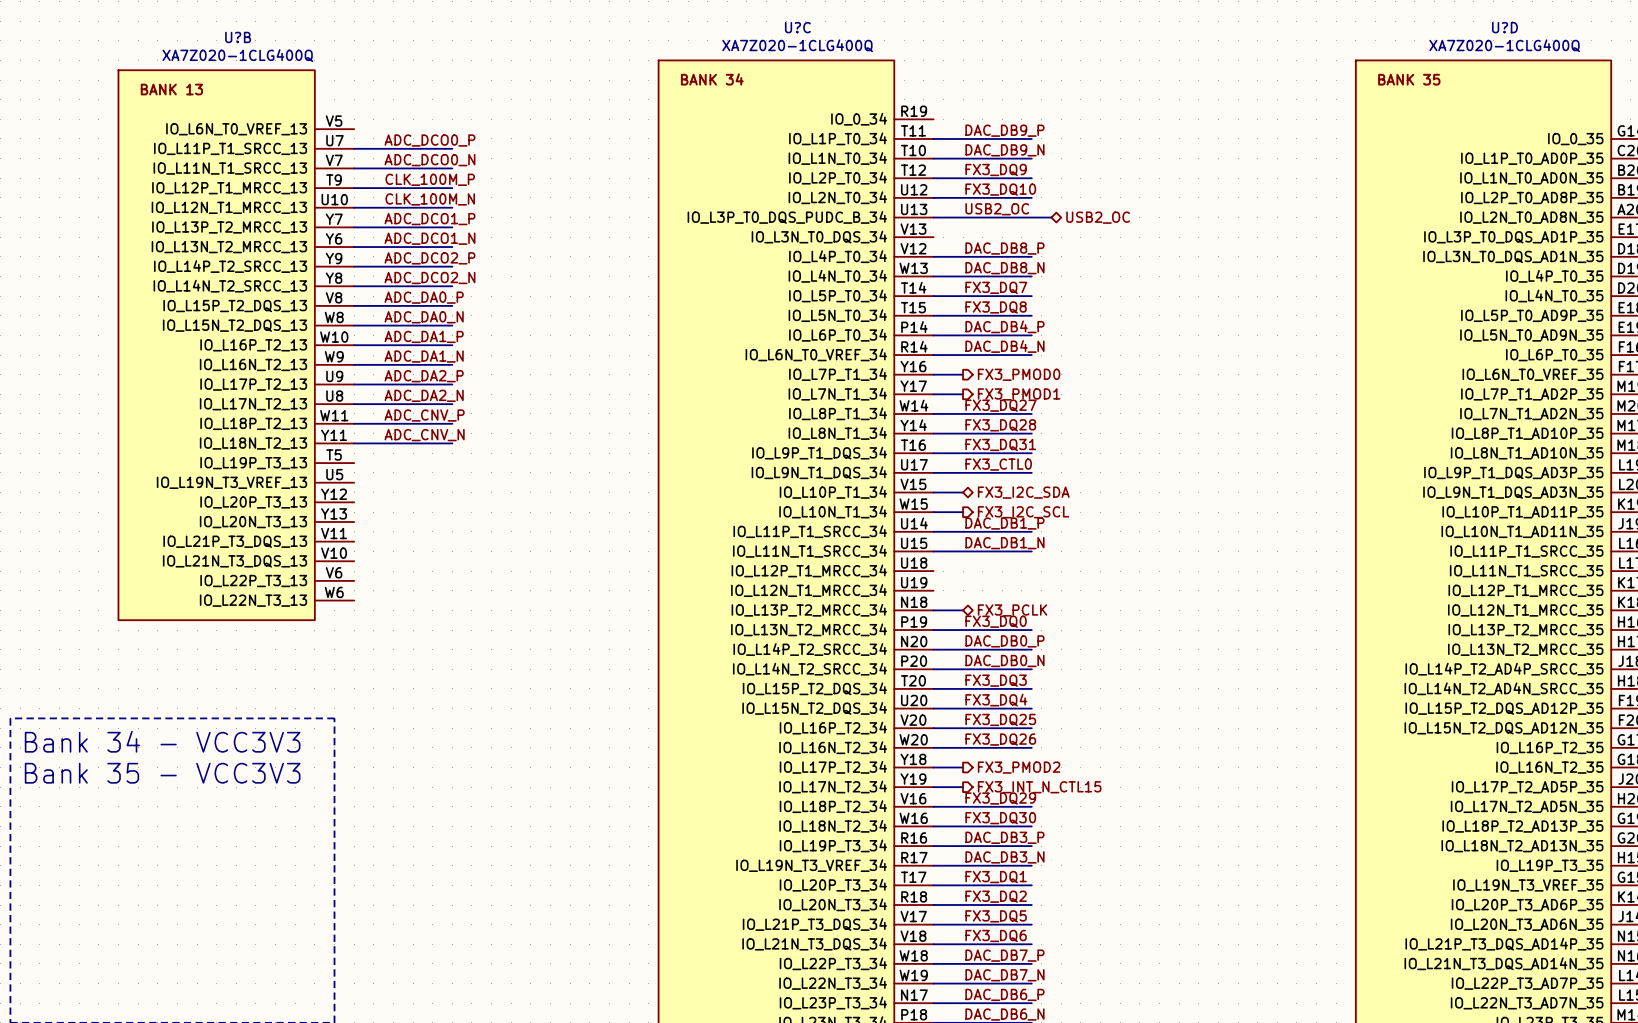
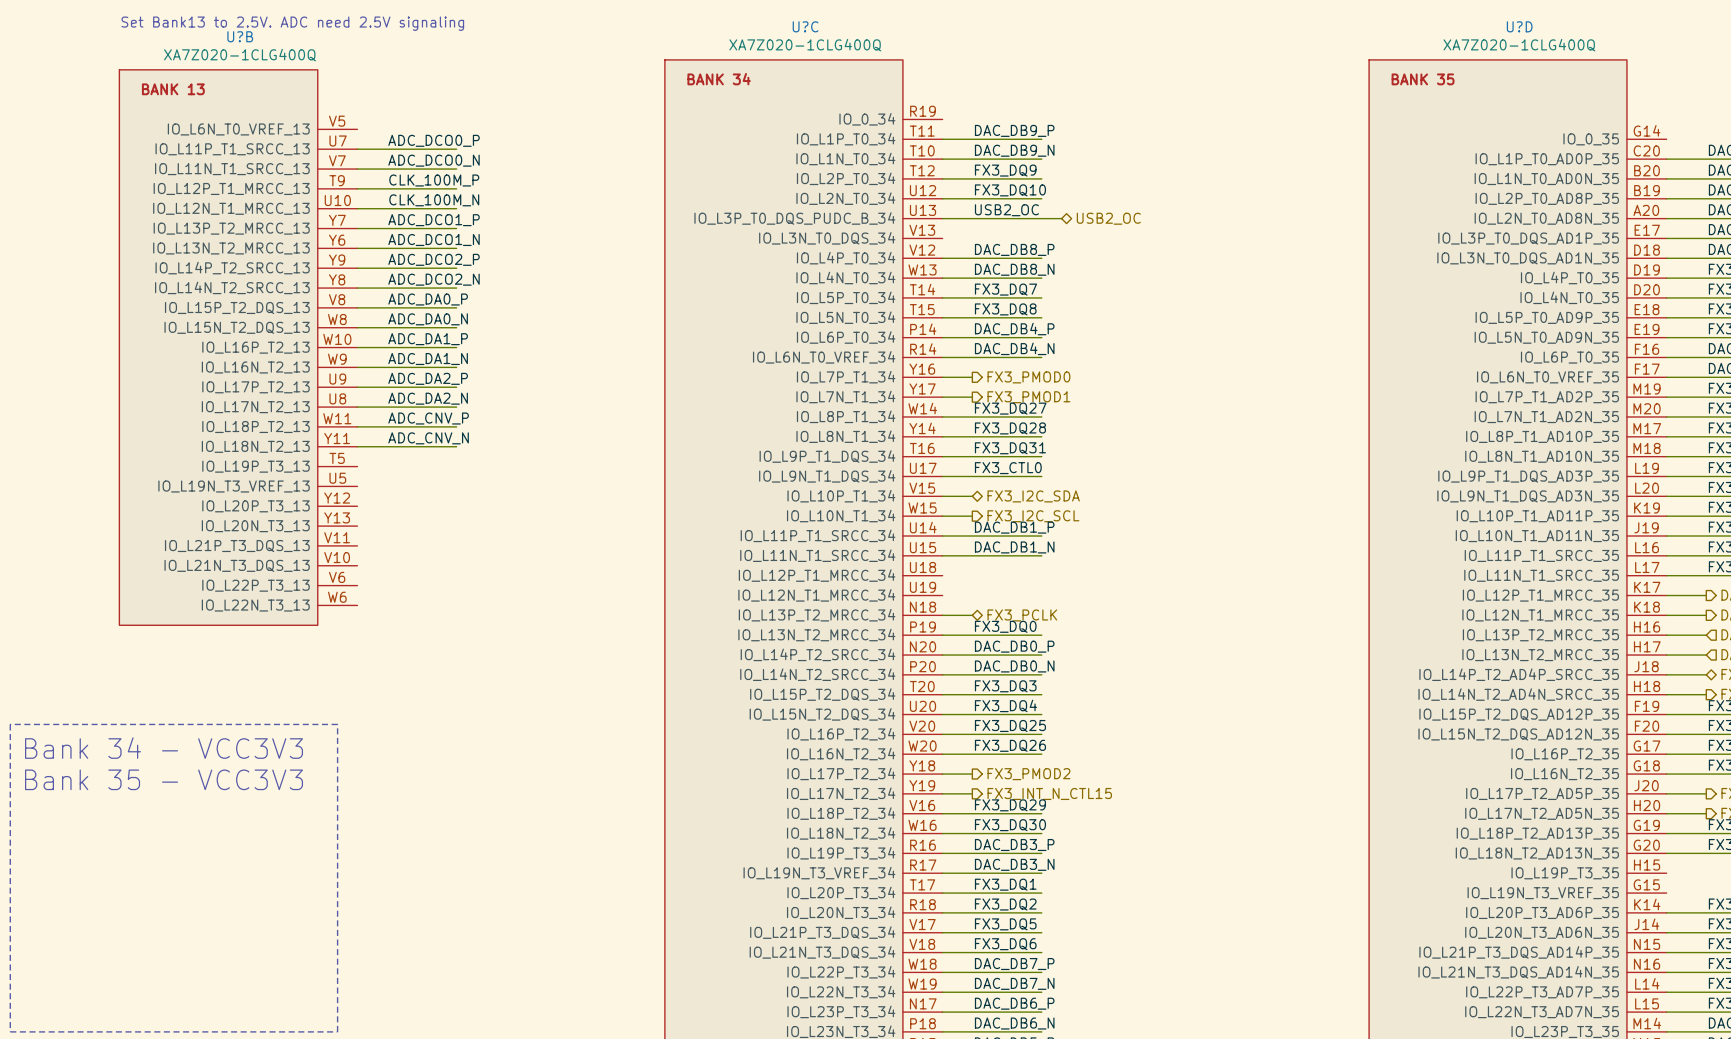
text: none -> Set Bank13 to 2.5V. ADC need 2.5V signaling (292, 23)

